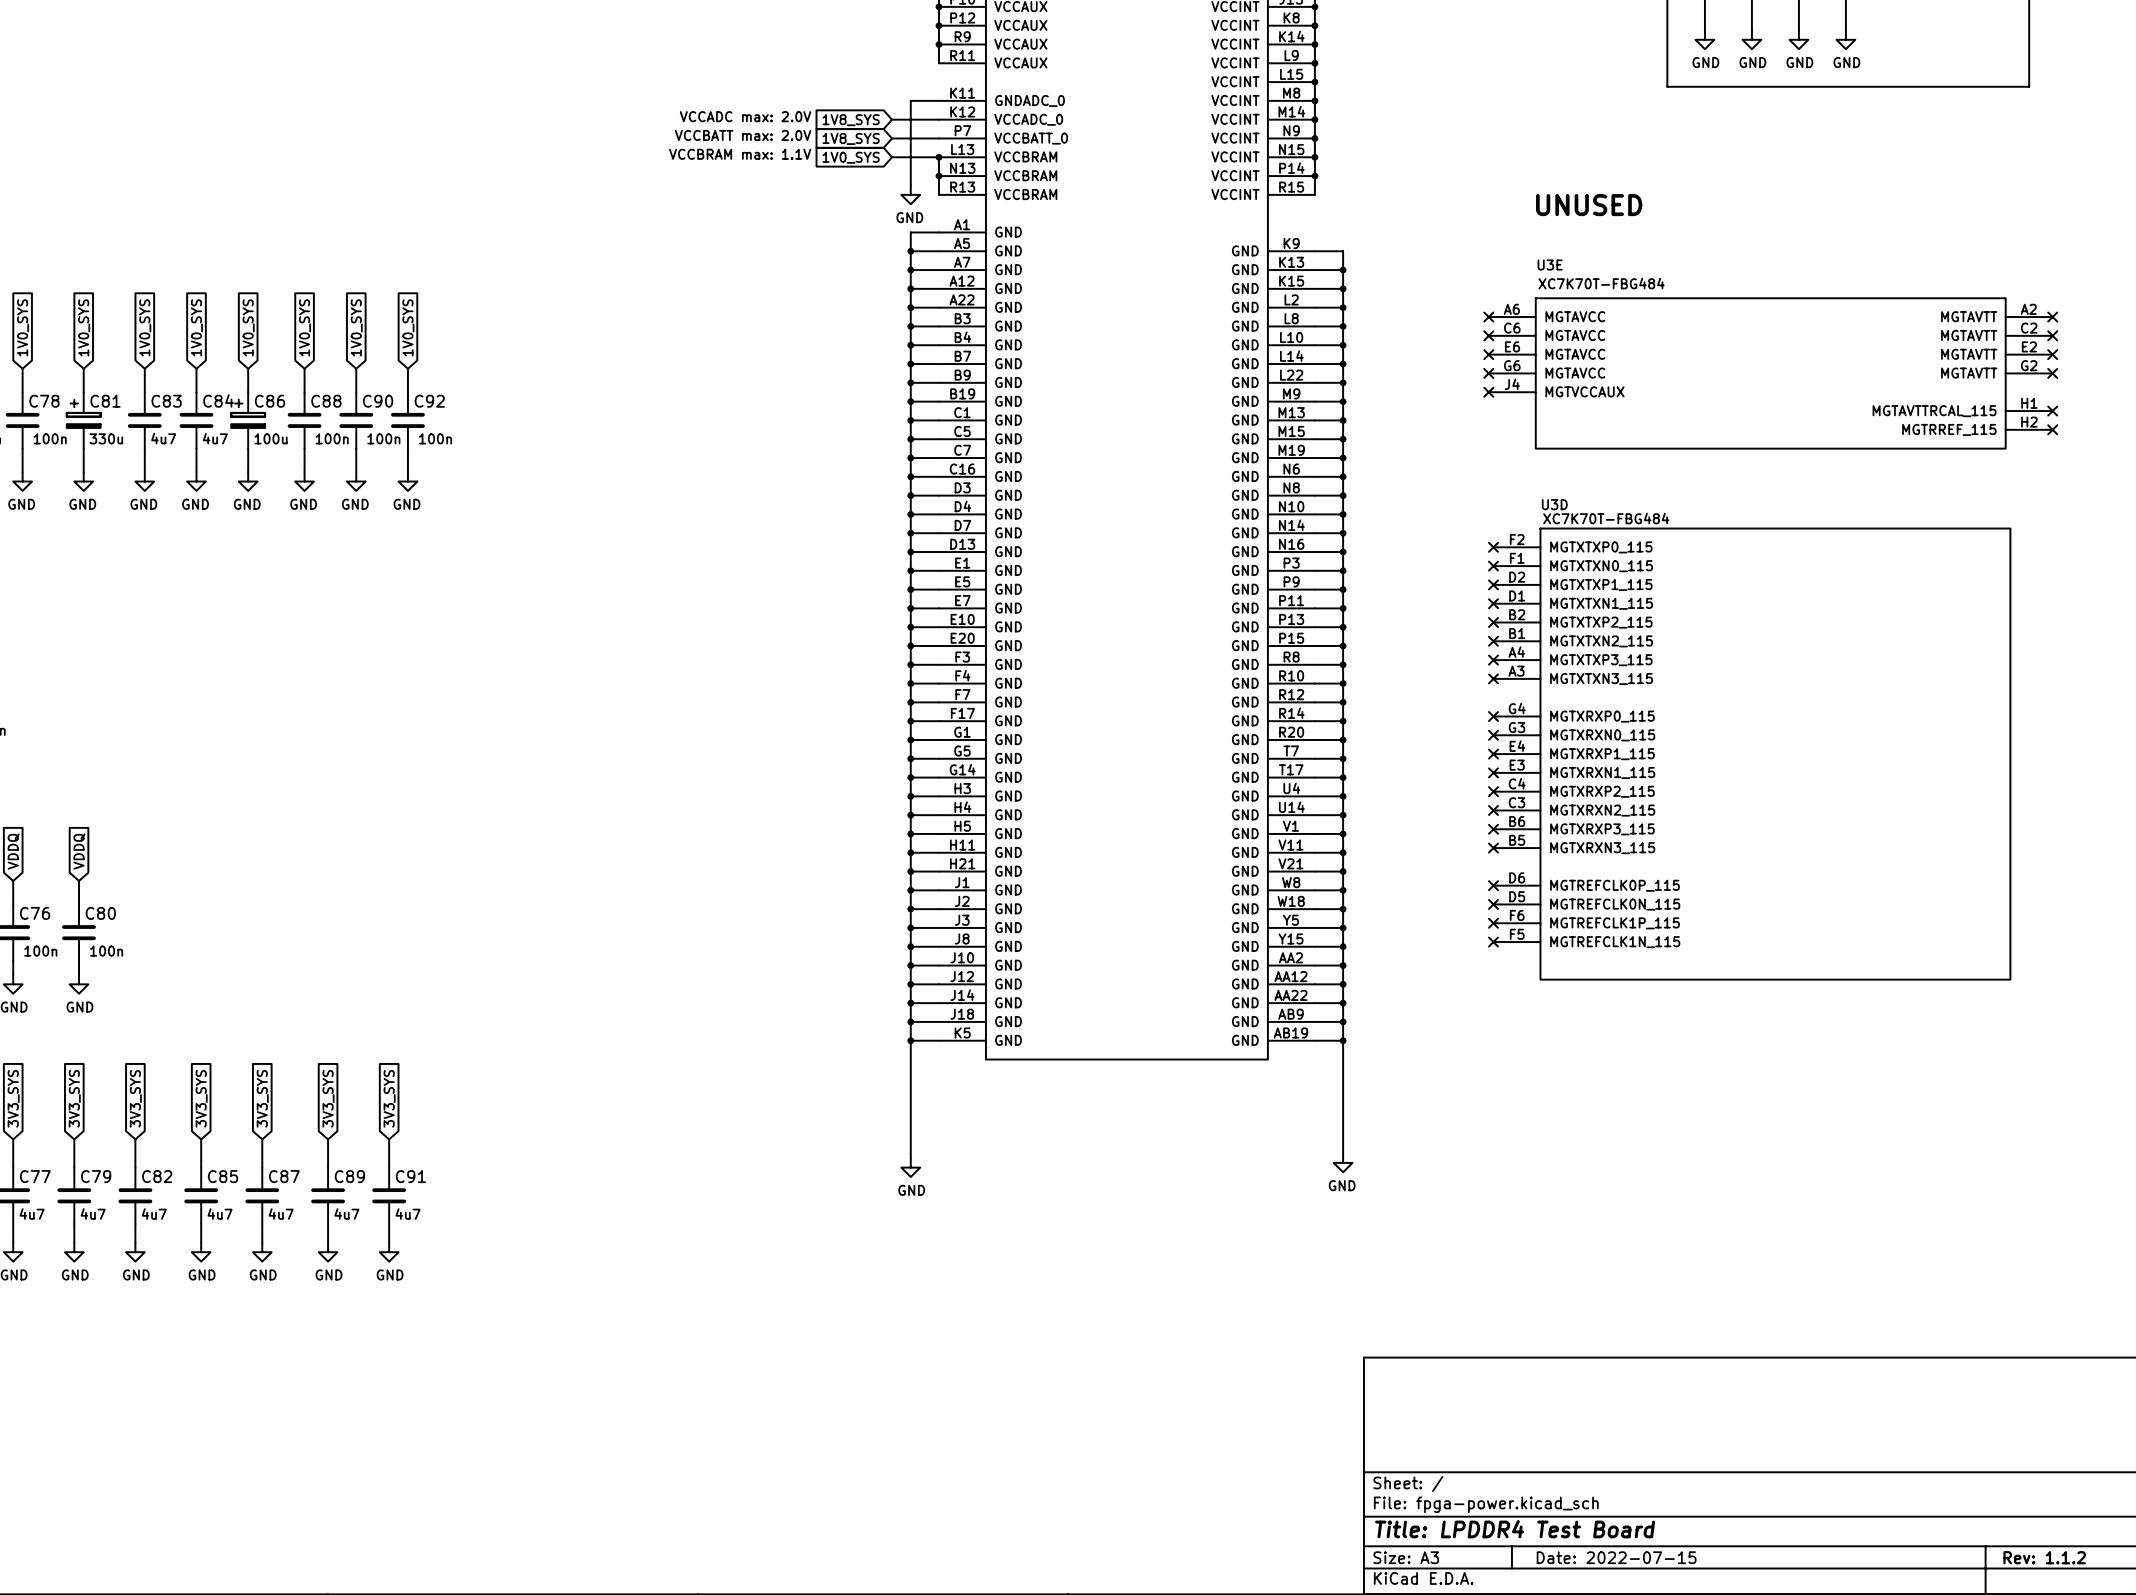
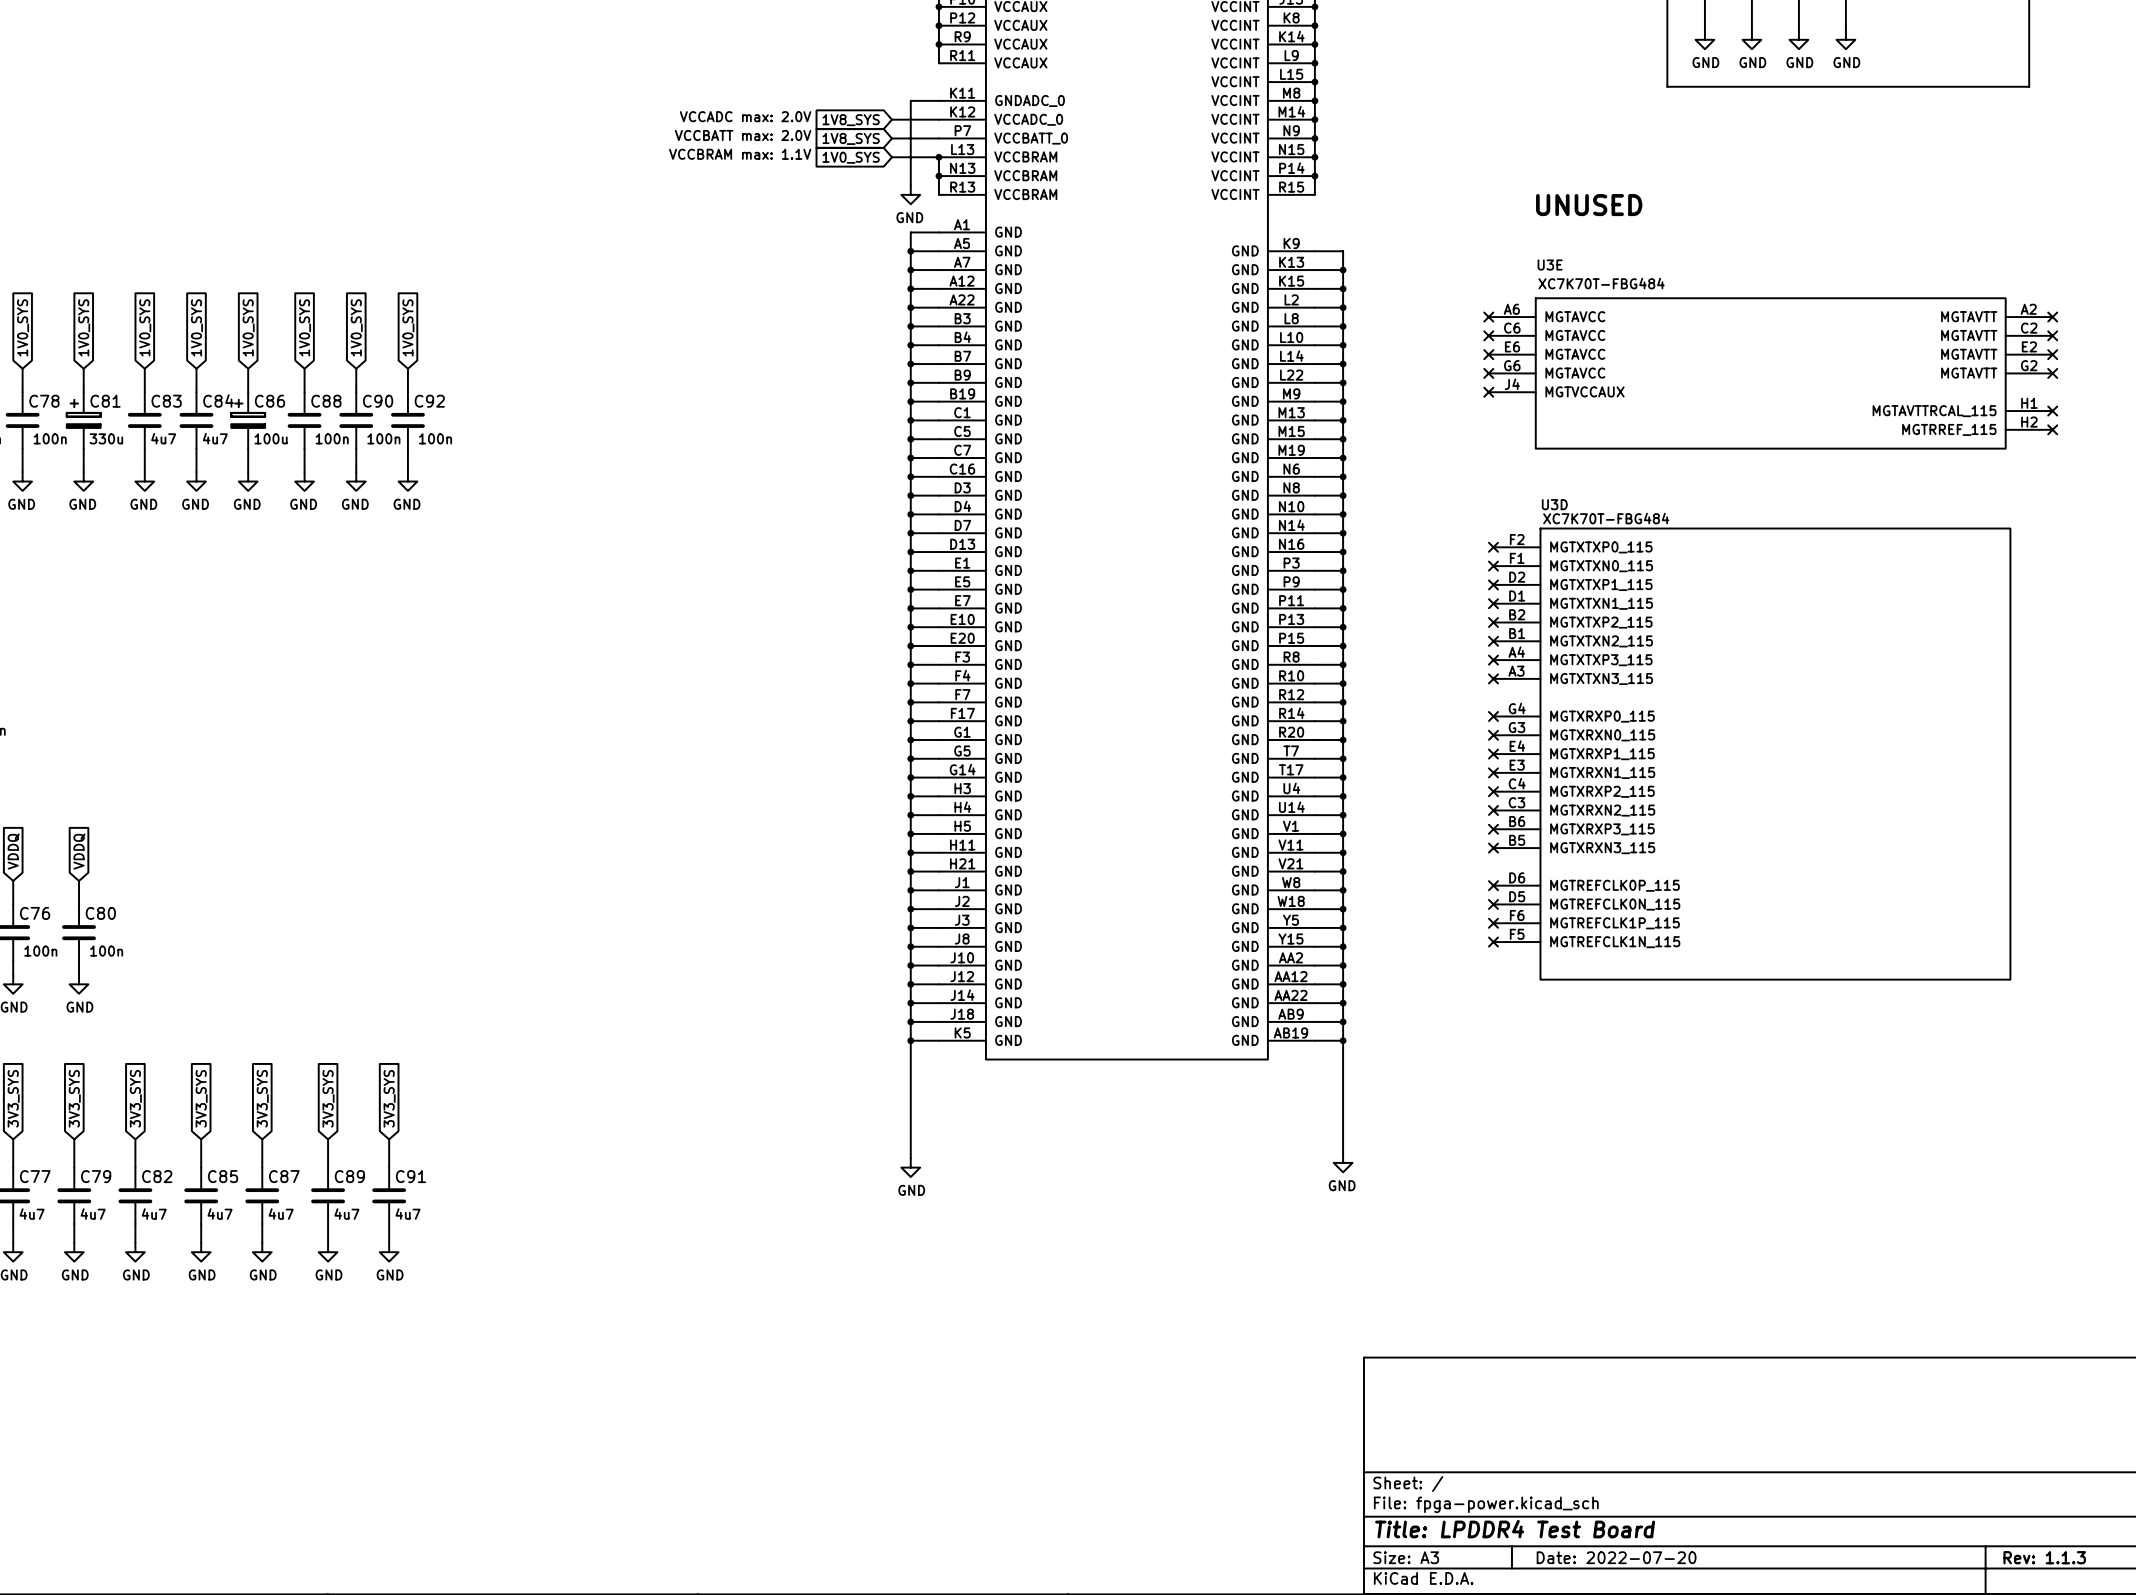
title block: Date: 2022-07-15 (1616, 1557) -> Date: 2022-07-20 (1616, 1557)
title block: Rev: 1.1.2 (2044, 1557) -> Rev: 1.1.3 (2044, 1557)

